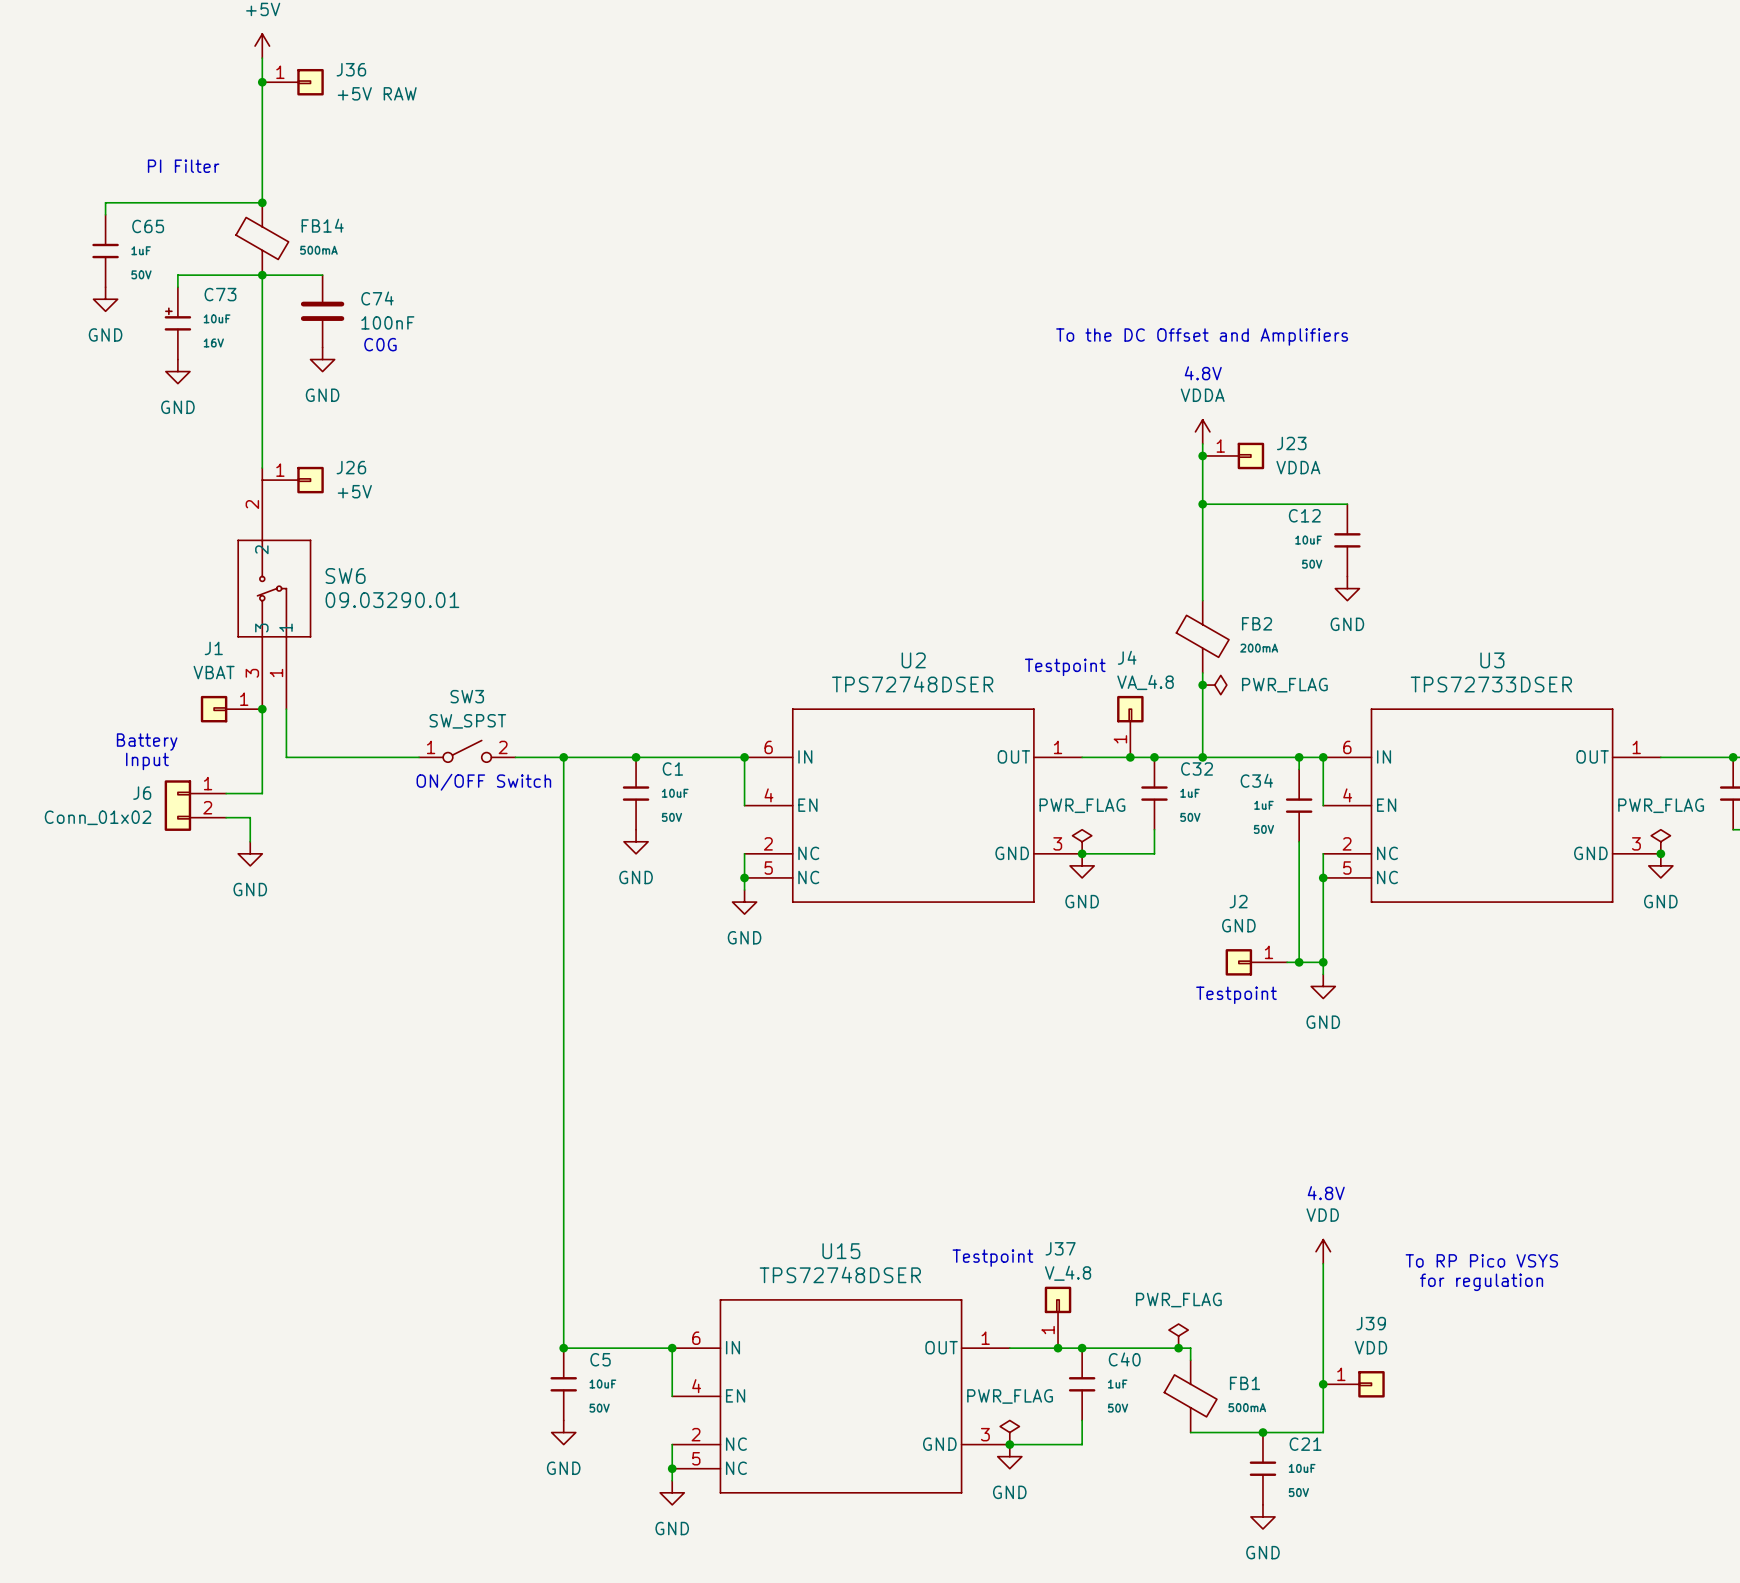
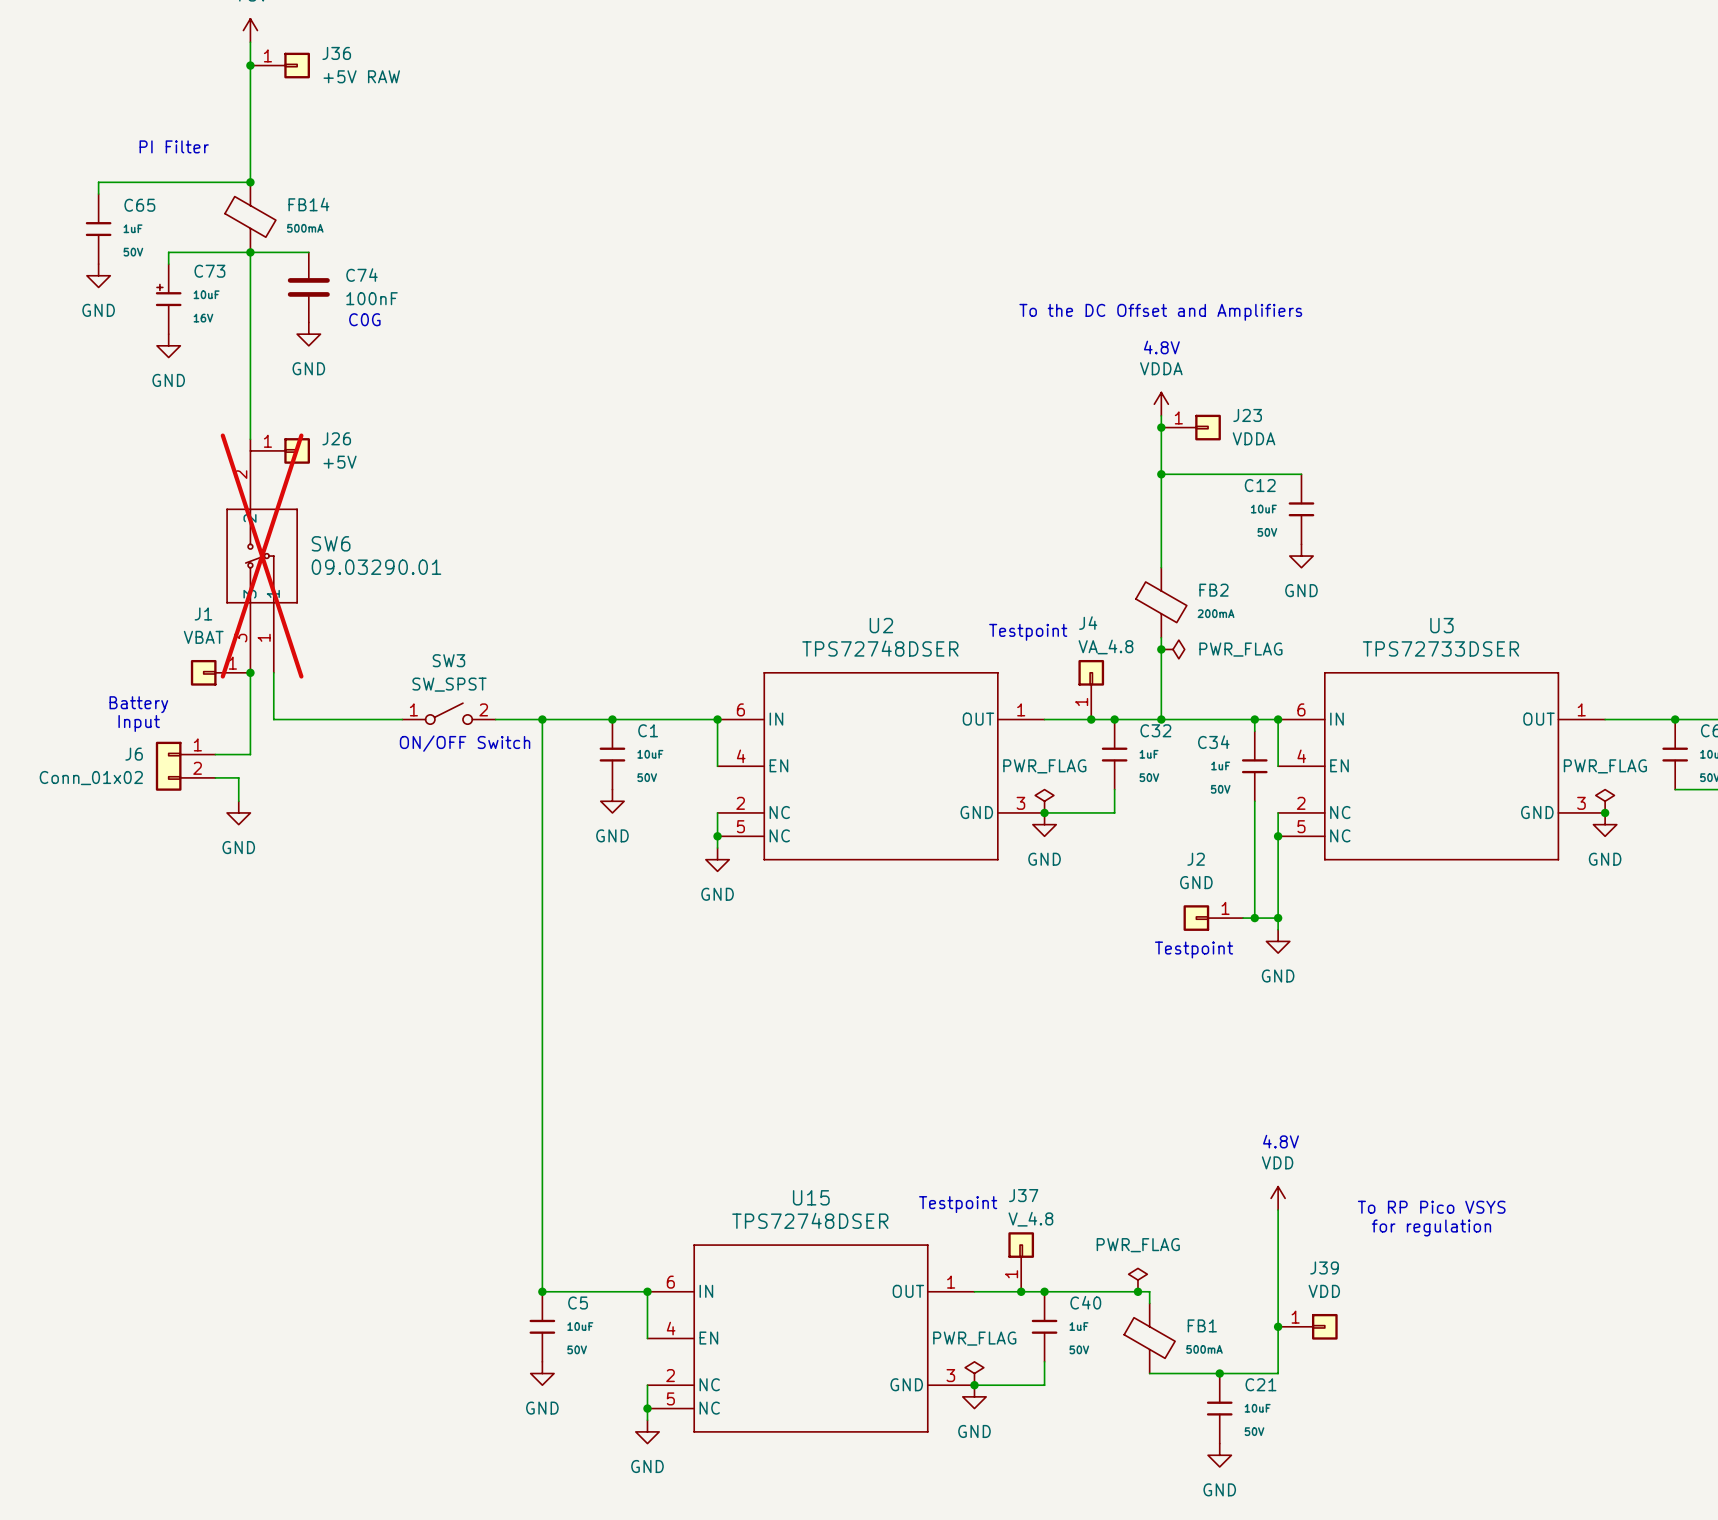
SW6 do-not-place cross: none -> (262, 556)

